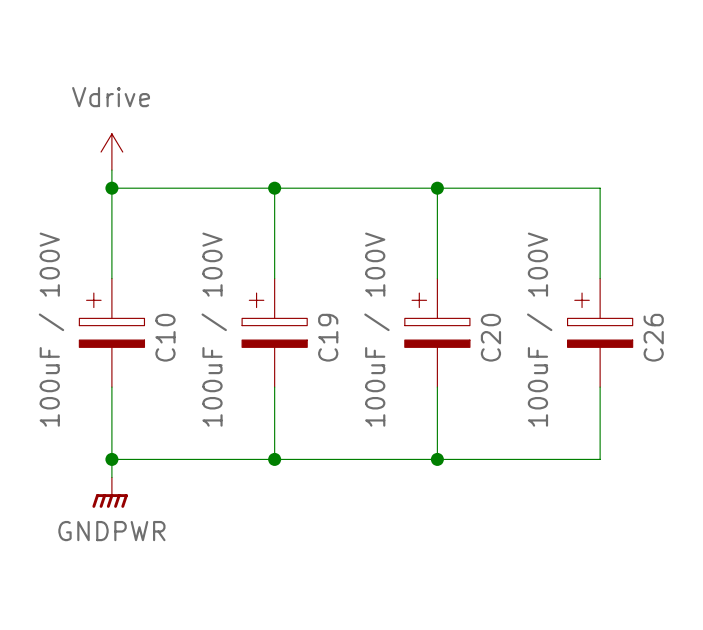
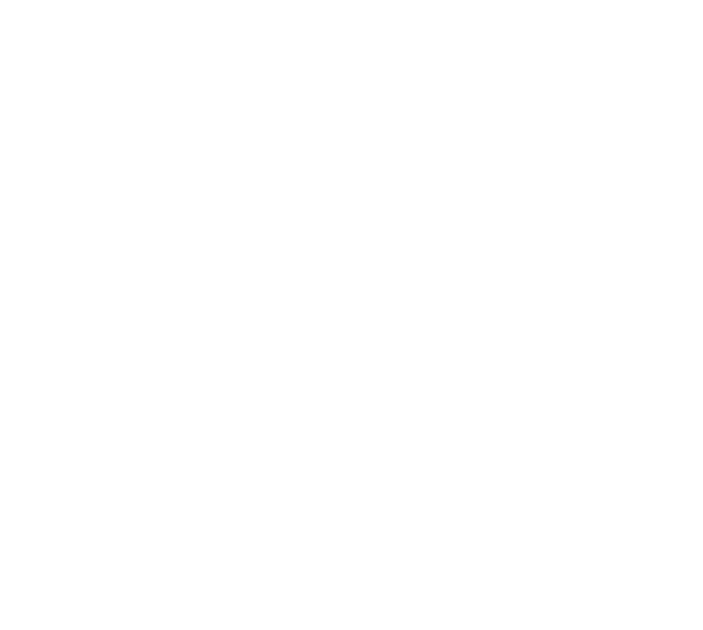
power symbol: Vdrive (111, 152) -> none
wire: (111, 170) (111, 278) -> none
wire: (111, 188) (600, 188) (600, 278) -> none
junction: (111, 188) -> none
wire: (274, 188) (274, 278) -> none
junction: (274, 188) -> none
wire: (437, 188) (437, 278) -> none
junction: (437, 188) -> none
C10: 100uF / 100V (111, 332) -> none
C19: 100uF / 100V (274, 332) -> none
C20: 100uF / 100V (437, 332) -> none
C26: 100uF / 100V (600, 332) -> none
wire: (111, 387) (111, 477) -> none
wire: (274, 387) (274, 459) -> none
wire: (437, 387) (437, 459) -> none
wire: (600, 387) (600, 459) (111, 459) -> none
junction: (111, 459) -> none
junction: (274, 459) -> none
junction: (437, 459) -> none
power symbol: GNDPWR (110, 492) -> none

